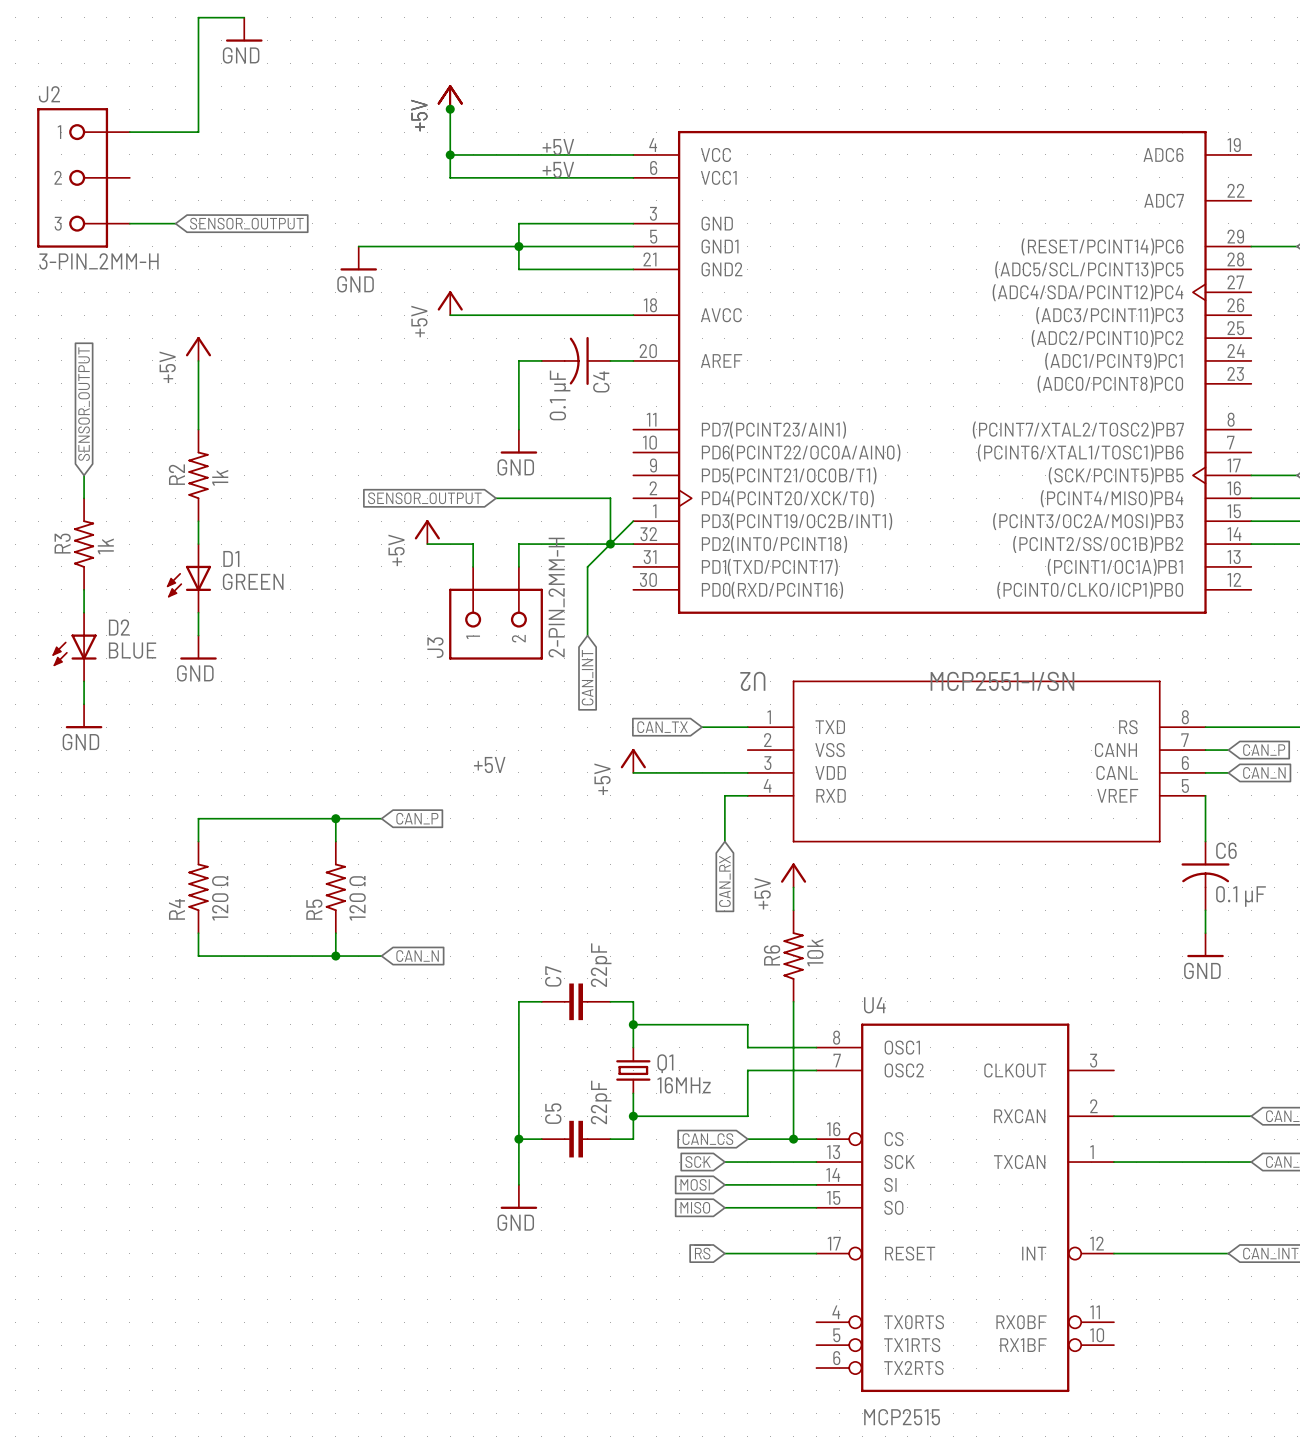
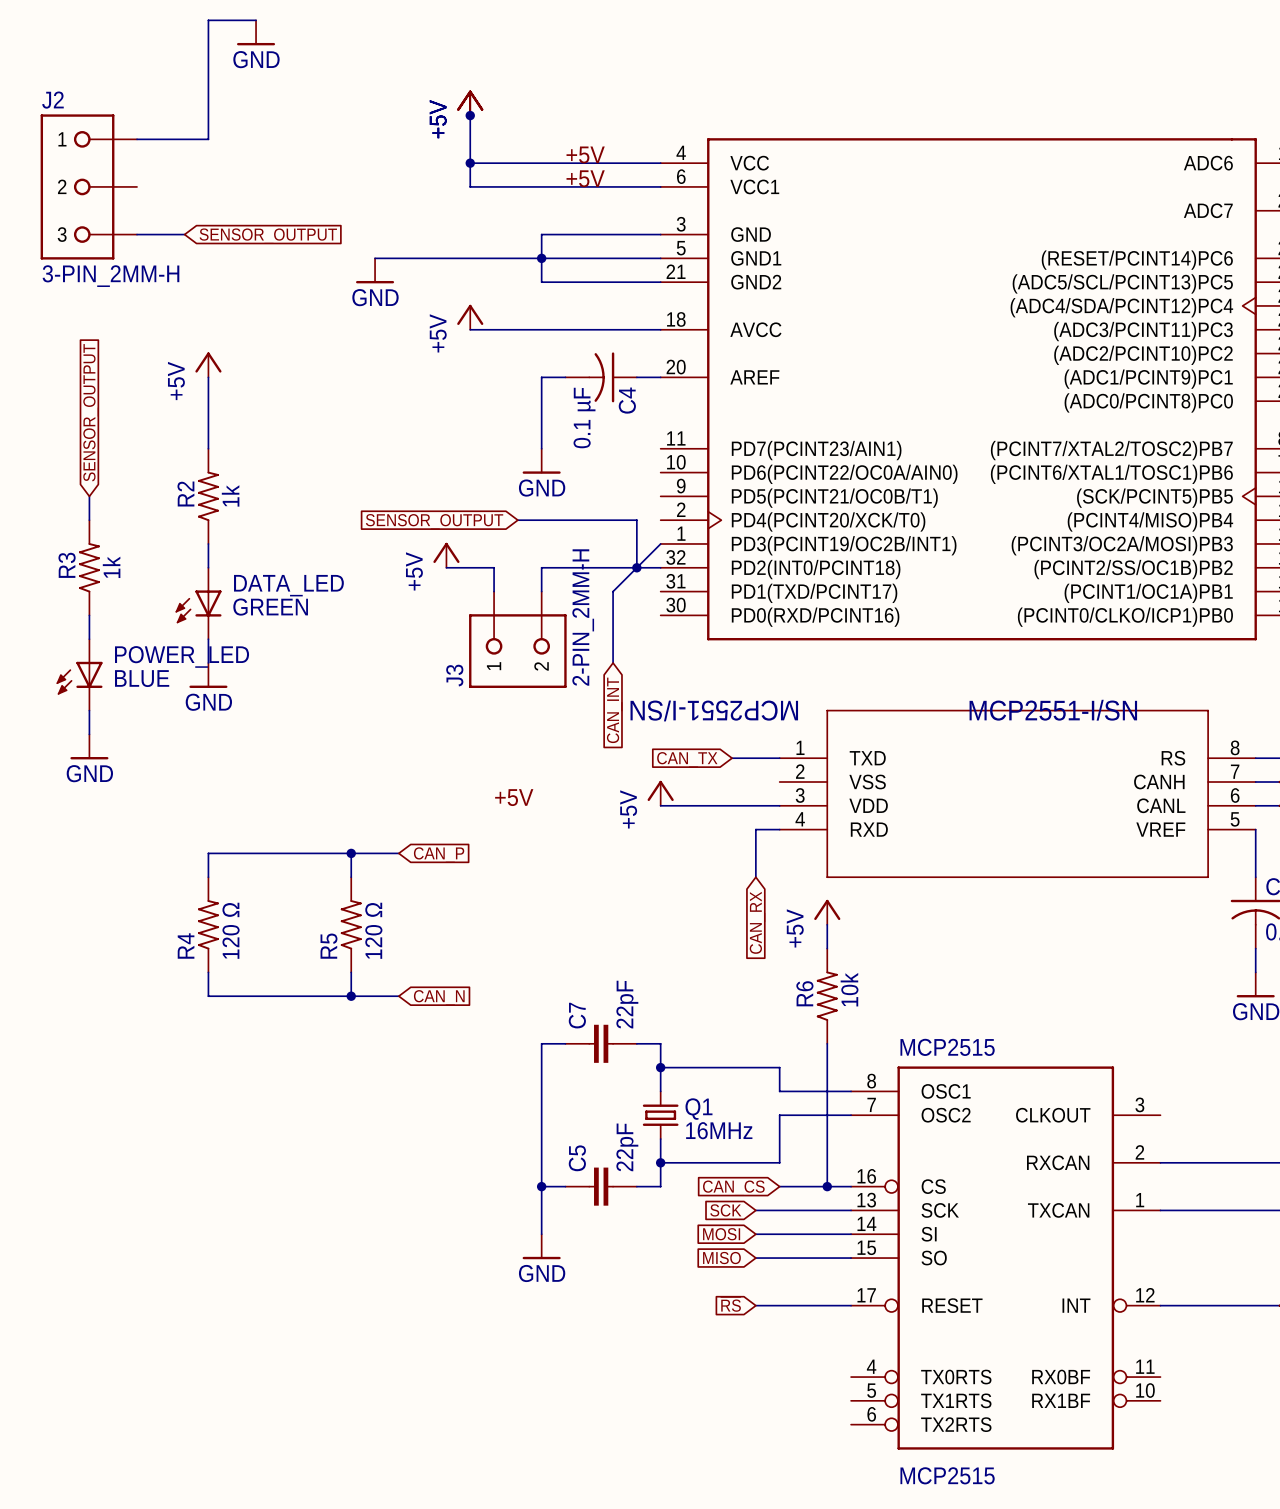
D1 name: D1 (231, 558) -> DATA_LED (288, 585)
D2 name: D2 (119, 627) -> POWER_LED (182, 656)
U2 name: U2 (752, 681) -> MCP2551-I/SN (714, 710)
U4 name: U4 (874, 1005) -> MCP2515 (947, 1047)

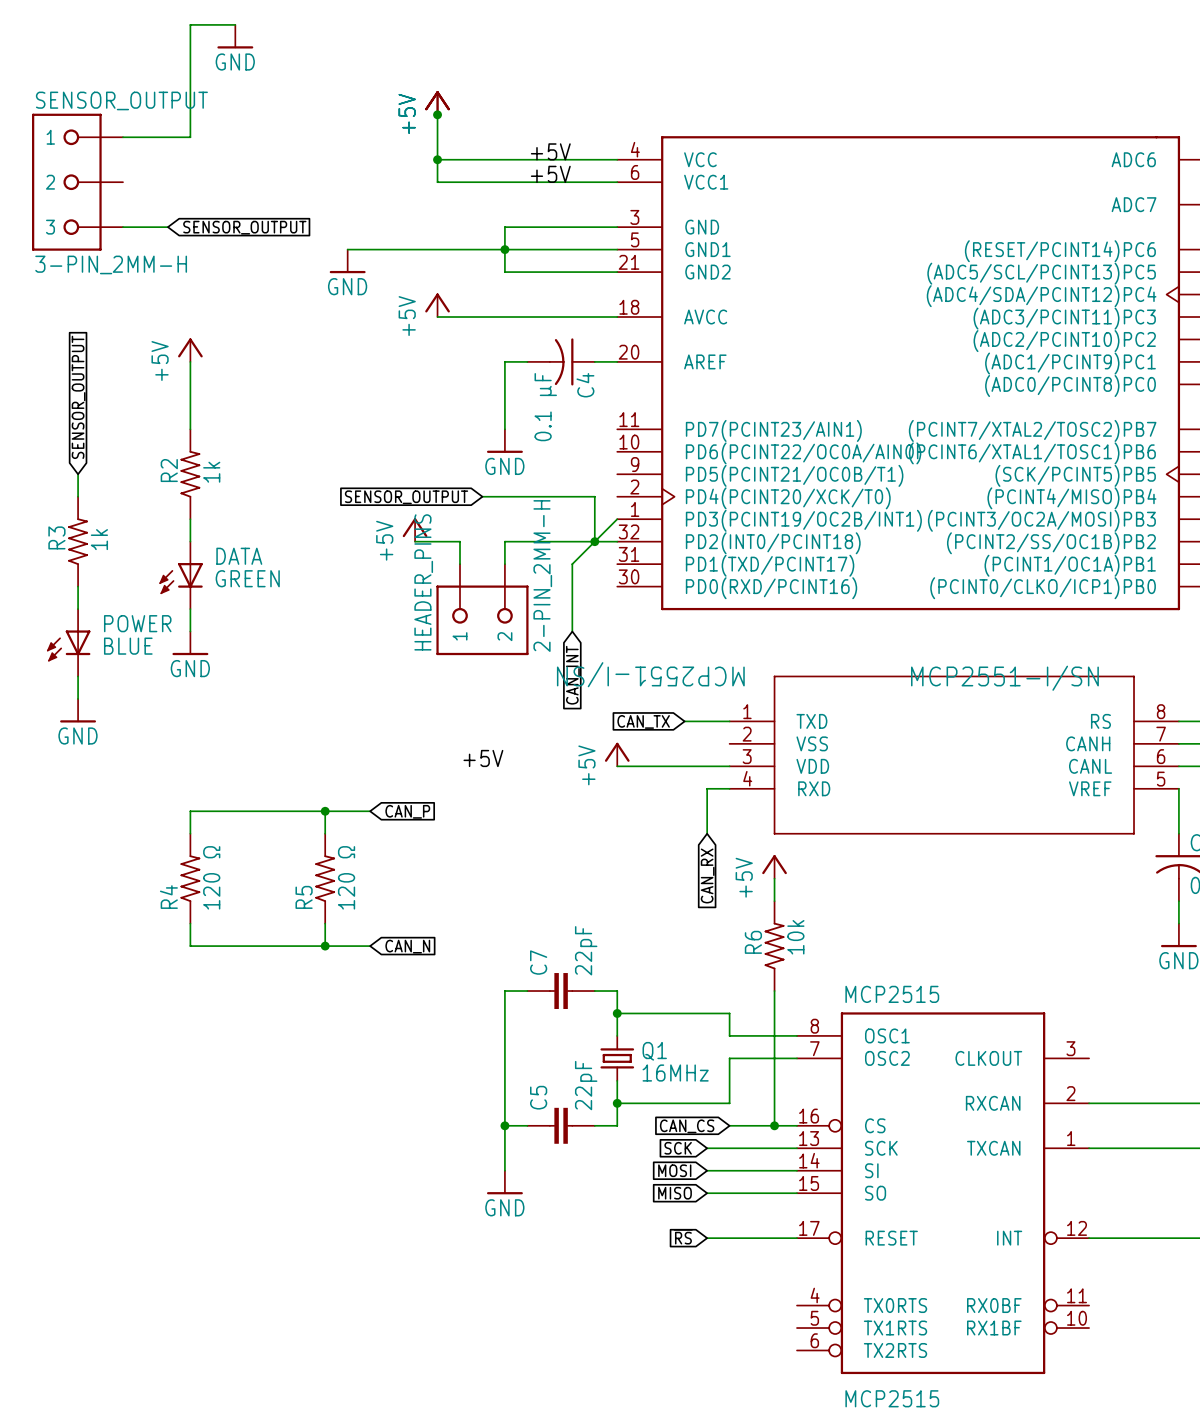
J2 name: J2 (52, 100) -> SENSOR_OUTPUT (121, 100)
DATA_LED name: DATA_LED (288, 585) -> DATA (239, 556)
POWER_LED name: POWER_LED (182, 656) -> POWER (137, 623)
J3 name: J3 (454, 675) -> HEADER_PINS (423, 582)

